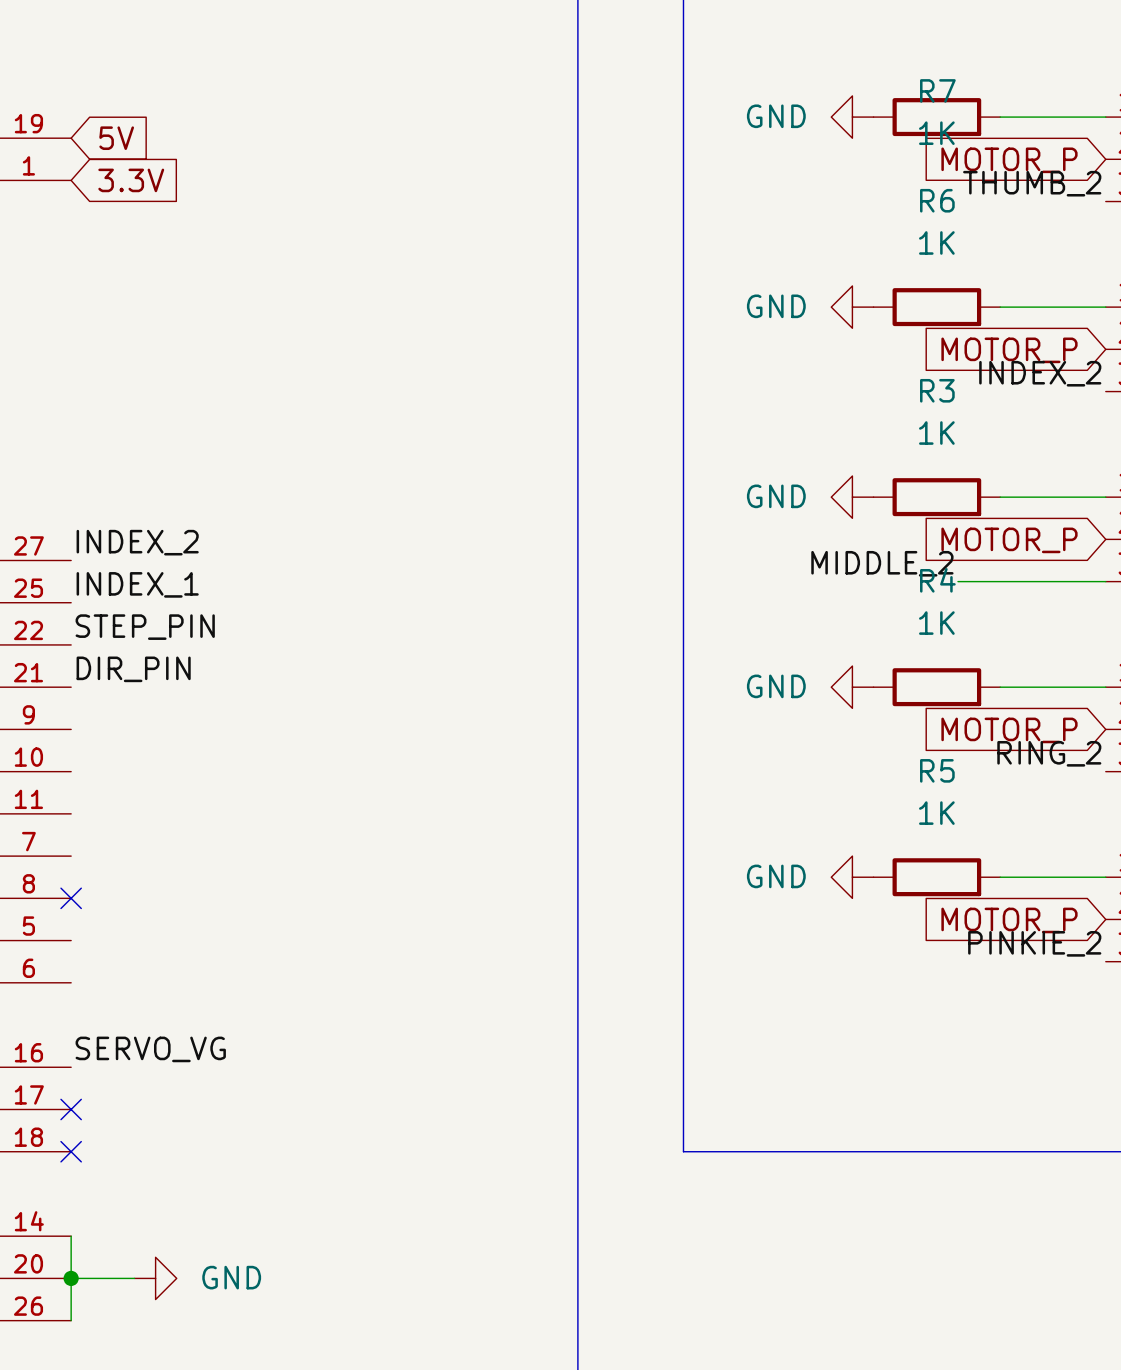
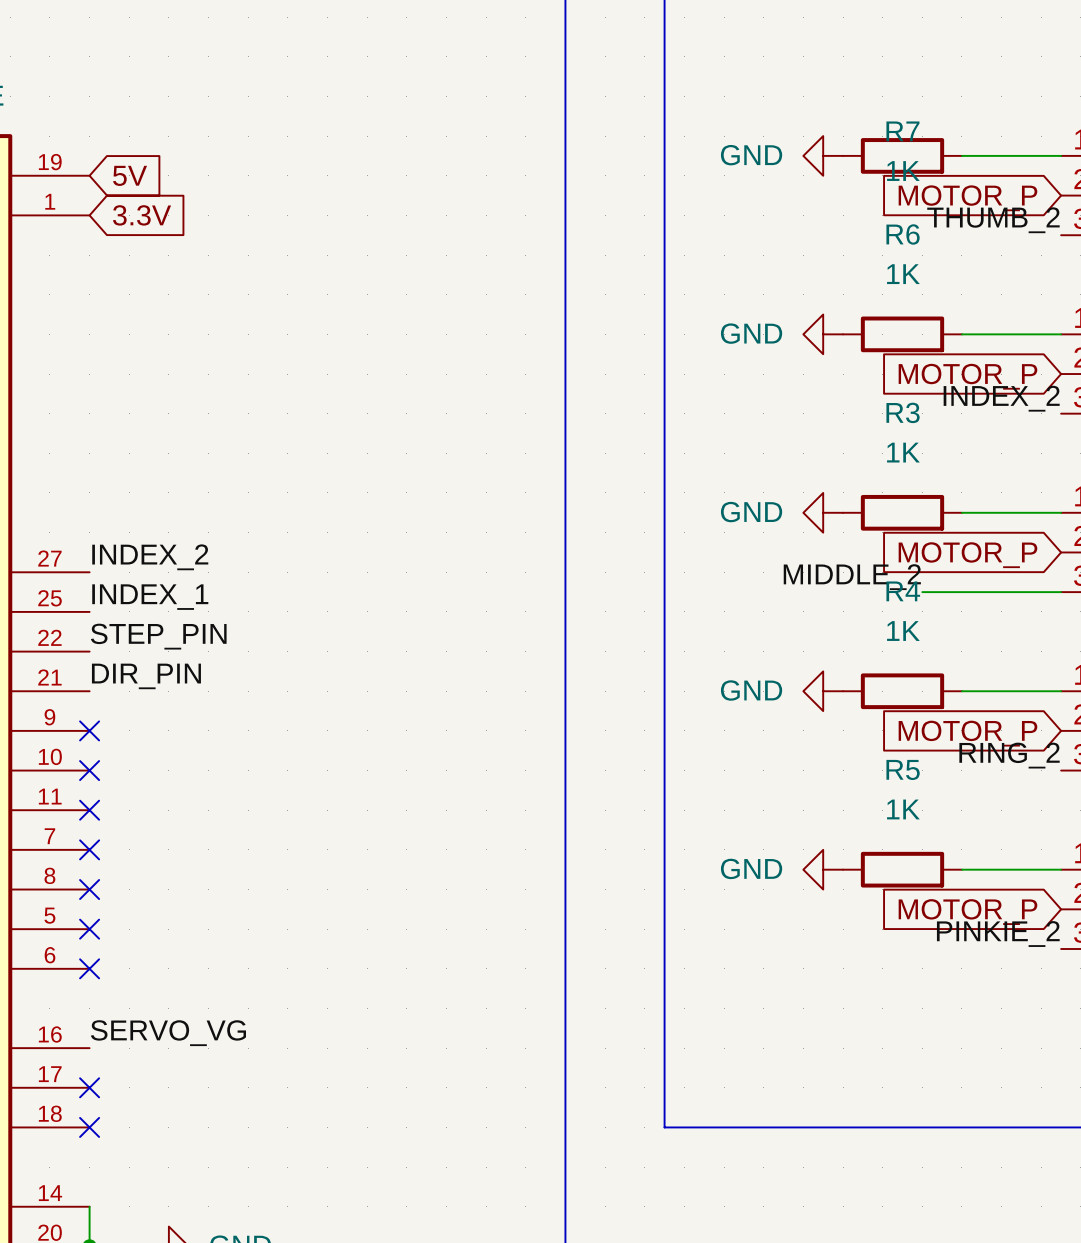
no-connect mark: none -> (89, 730)
no-connect mark: none -> (89, 770)
no-connect mark: none -> (89, 810)
no-connect mark: none -> (89, 849)
no-connect mark: none -> (89, 929)
no-connect mark: none -> (89, 968)

